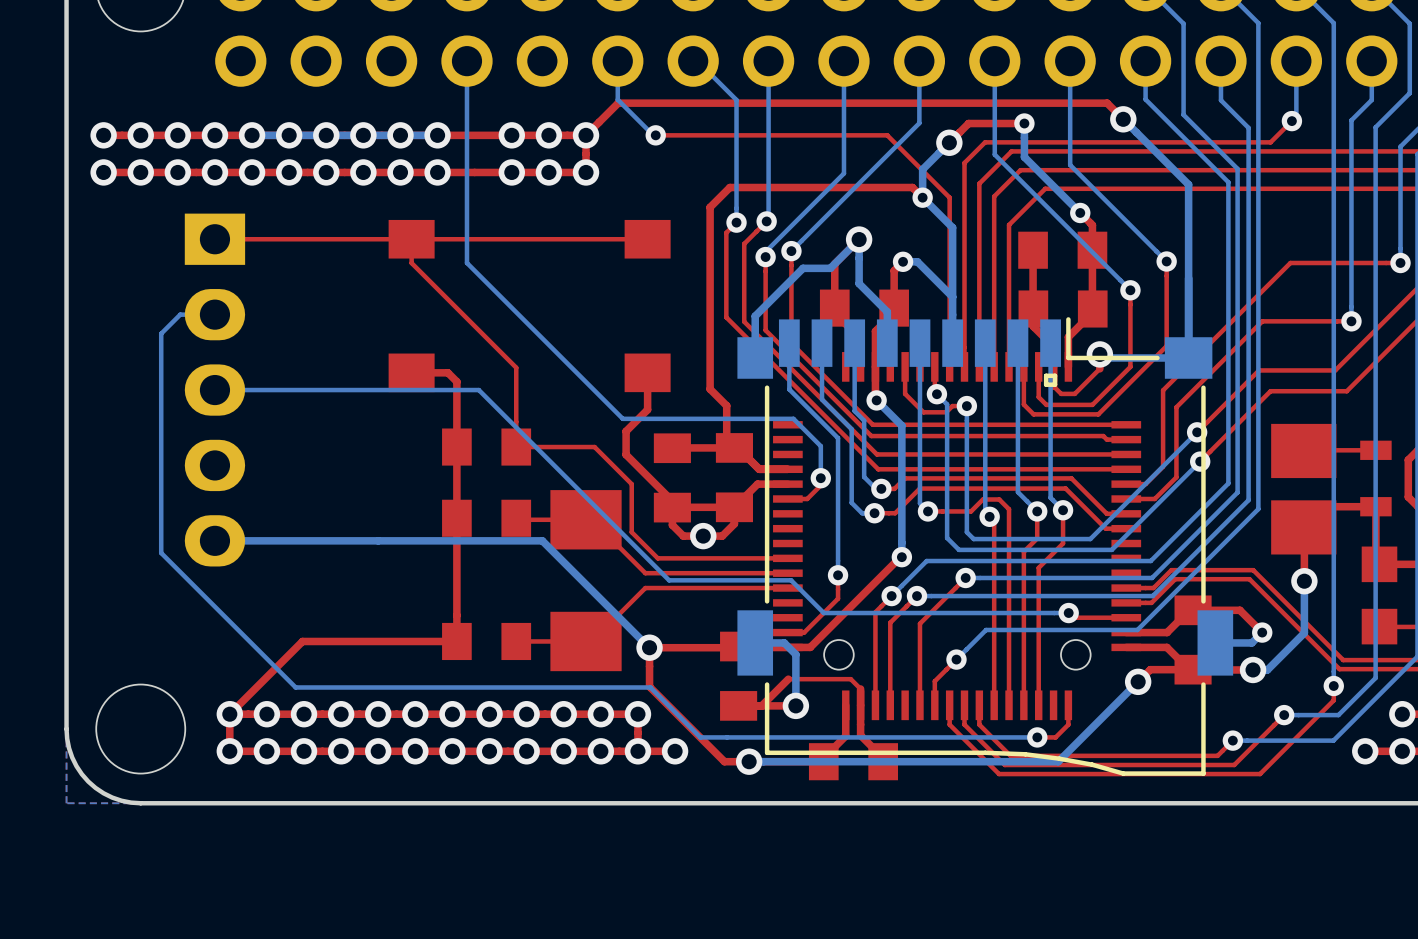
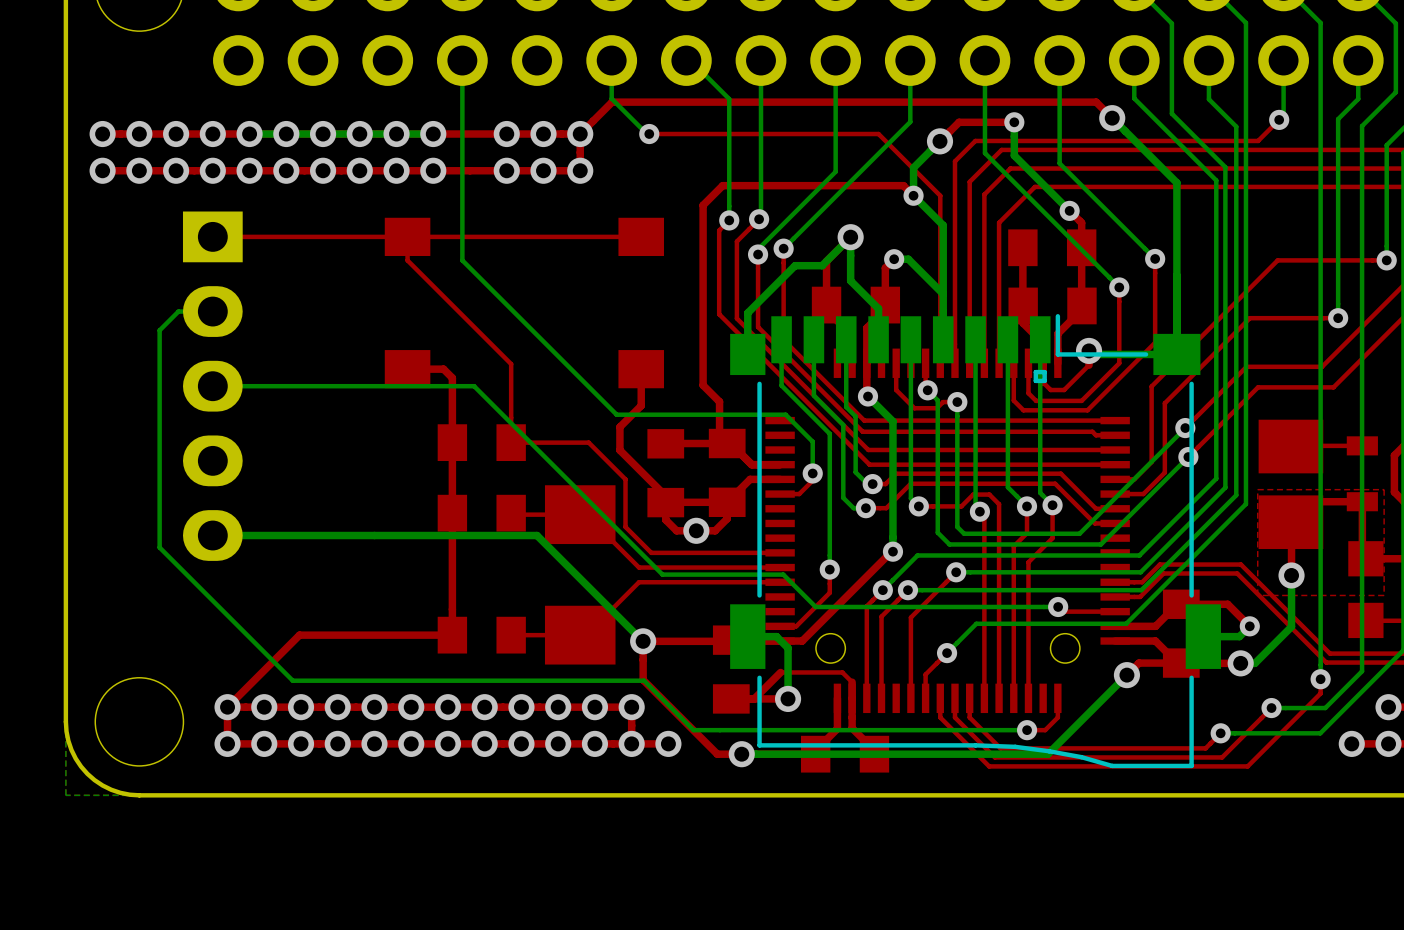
top zone outline: none -> (1384, 489) (1384, 595) (1257, 595) (1257, 489) (1384, 489)

